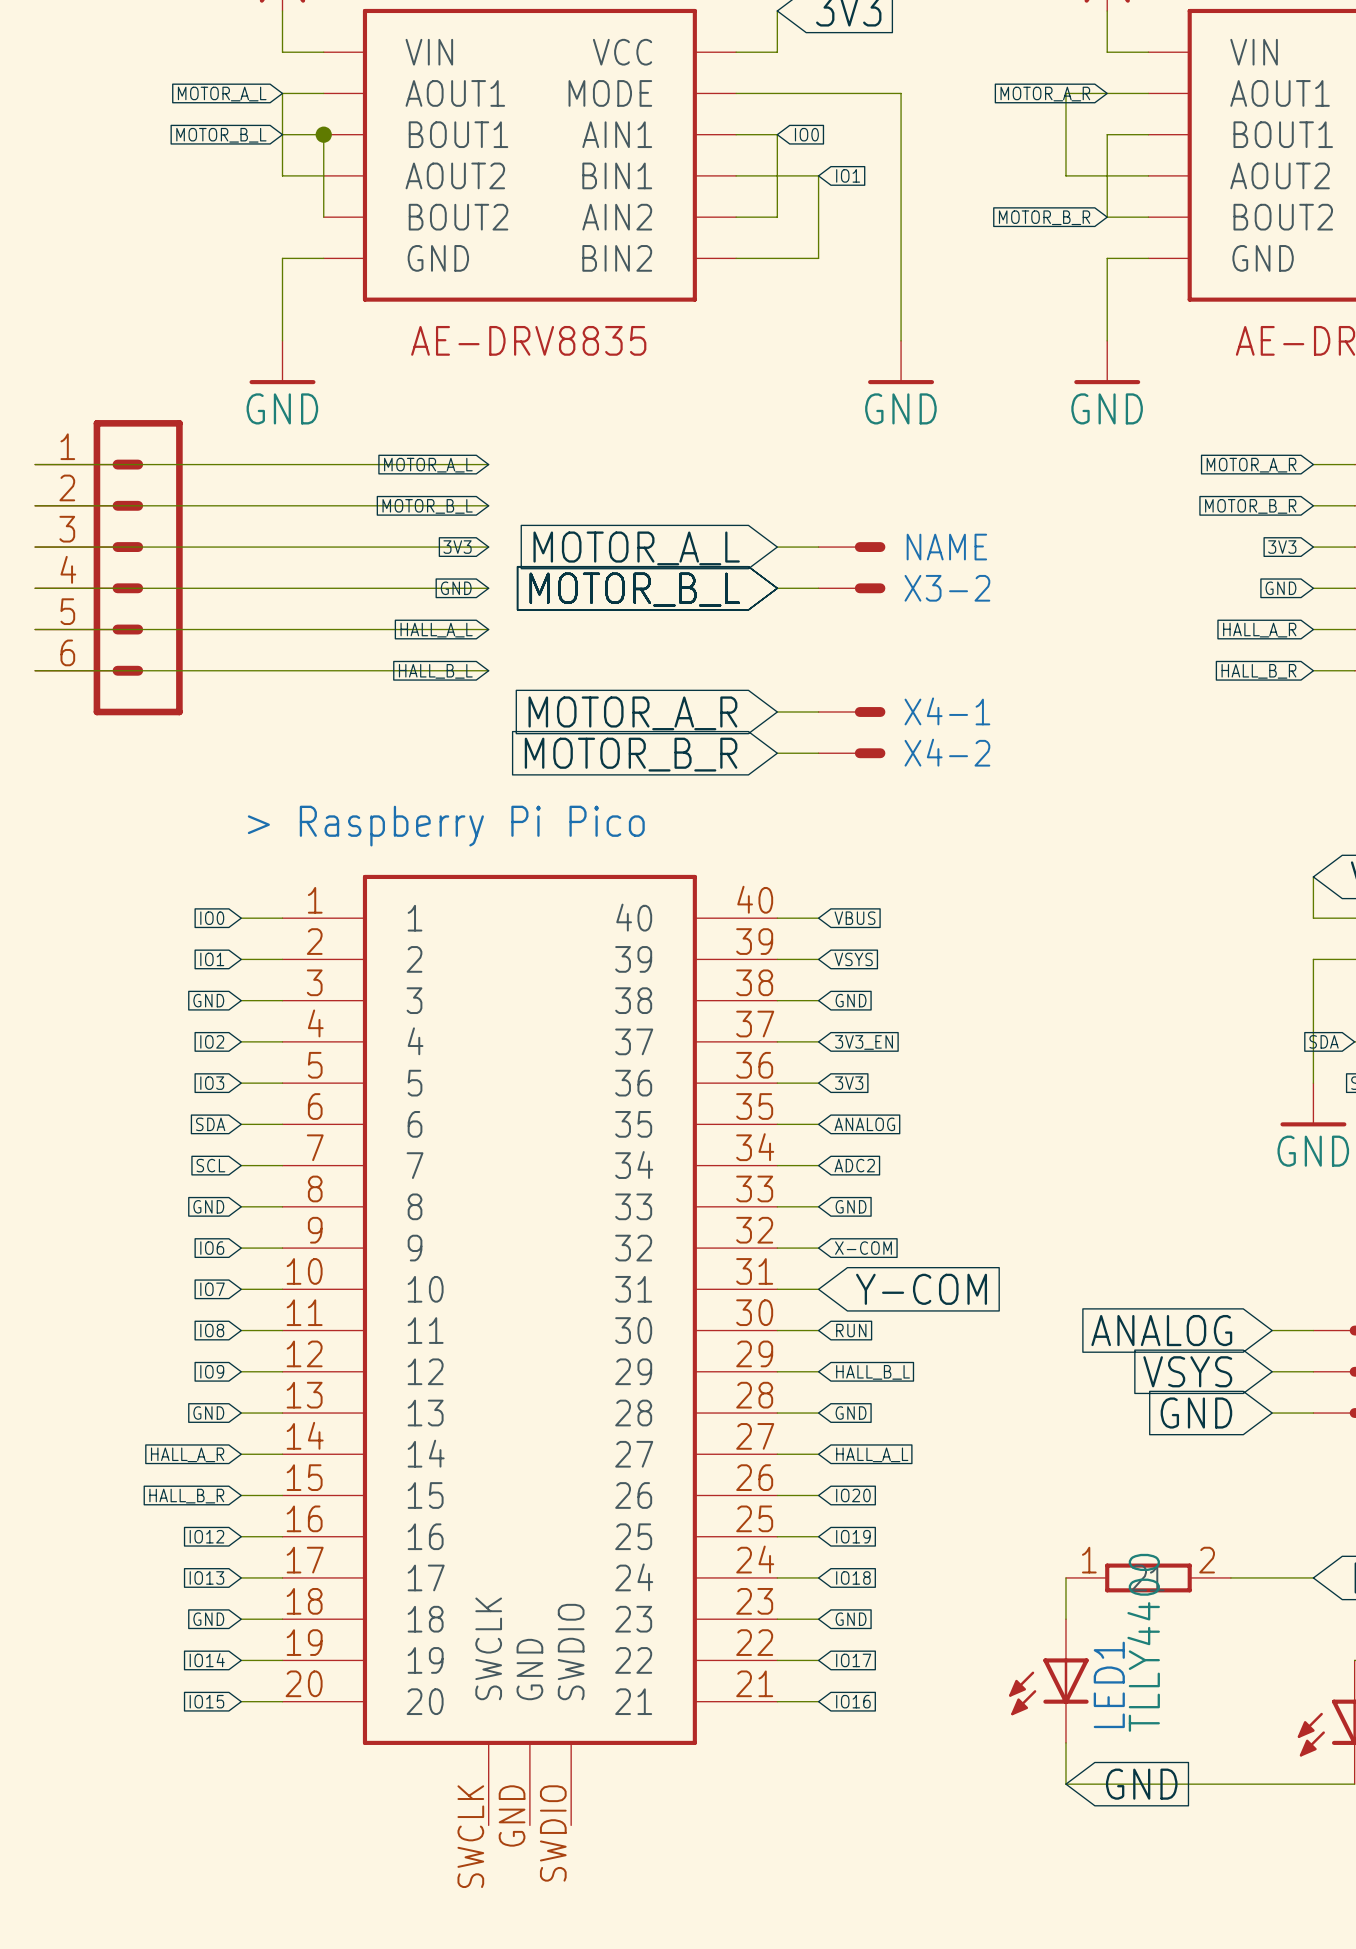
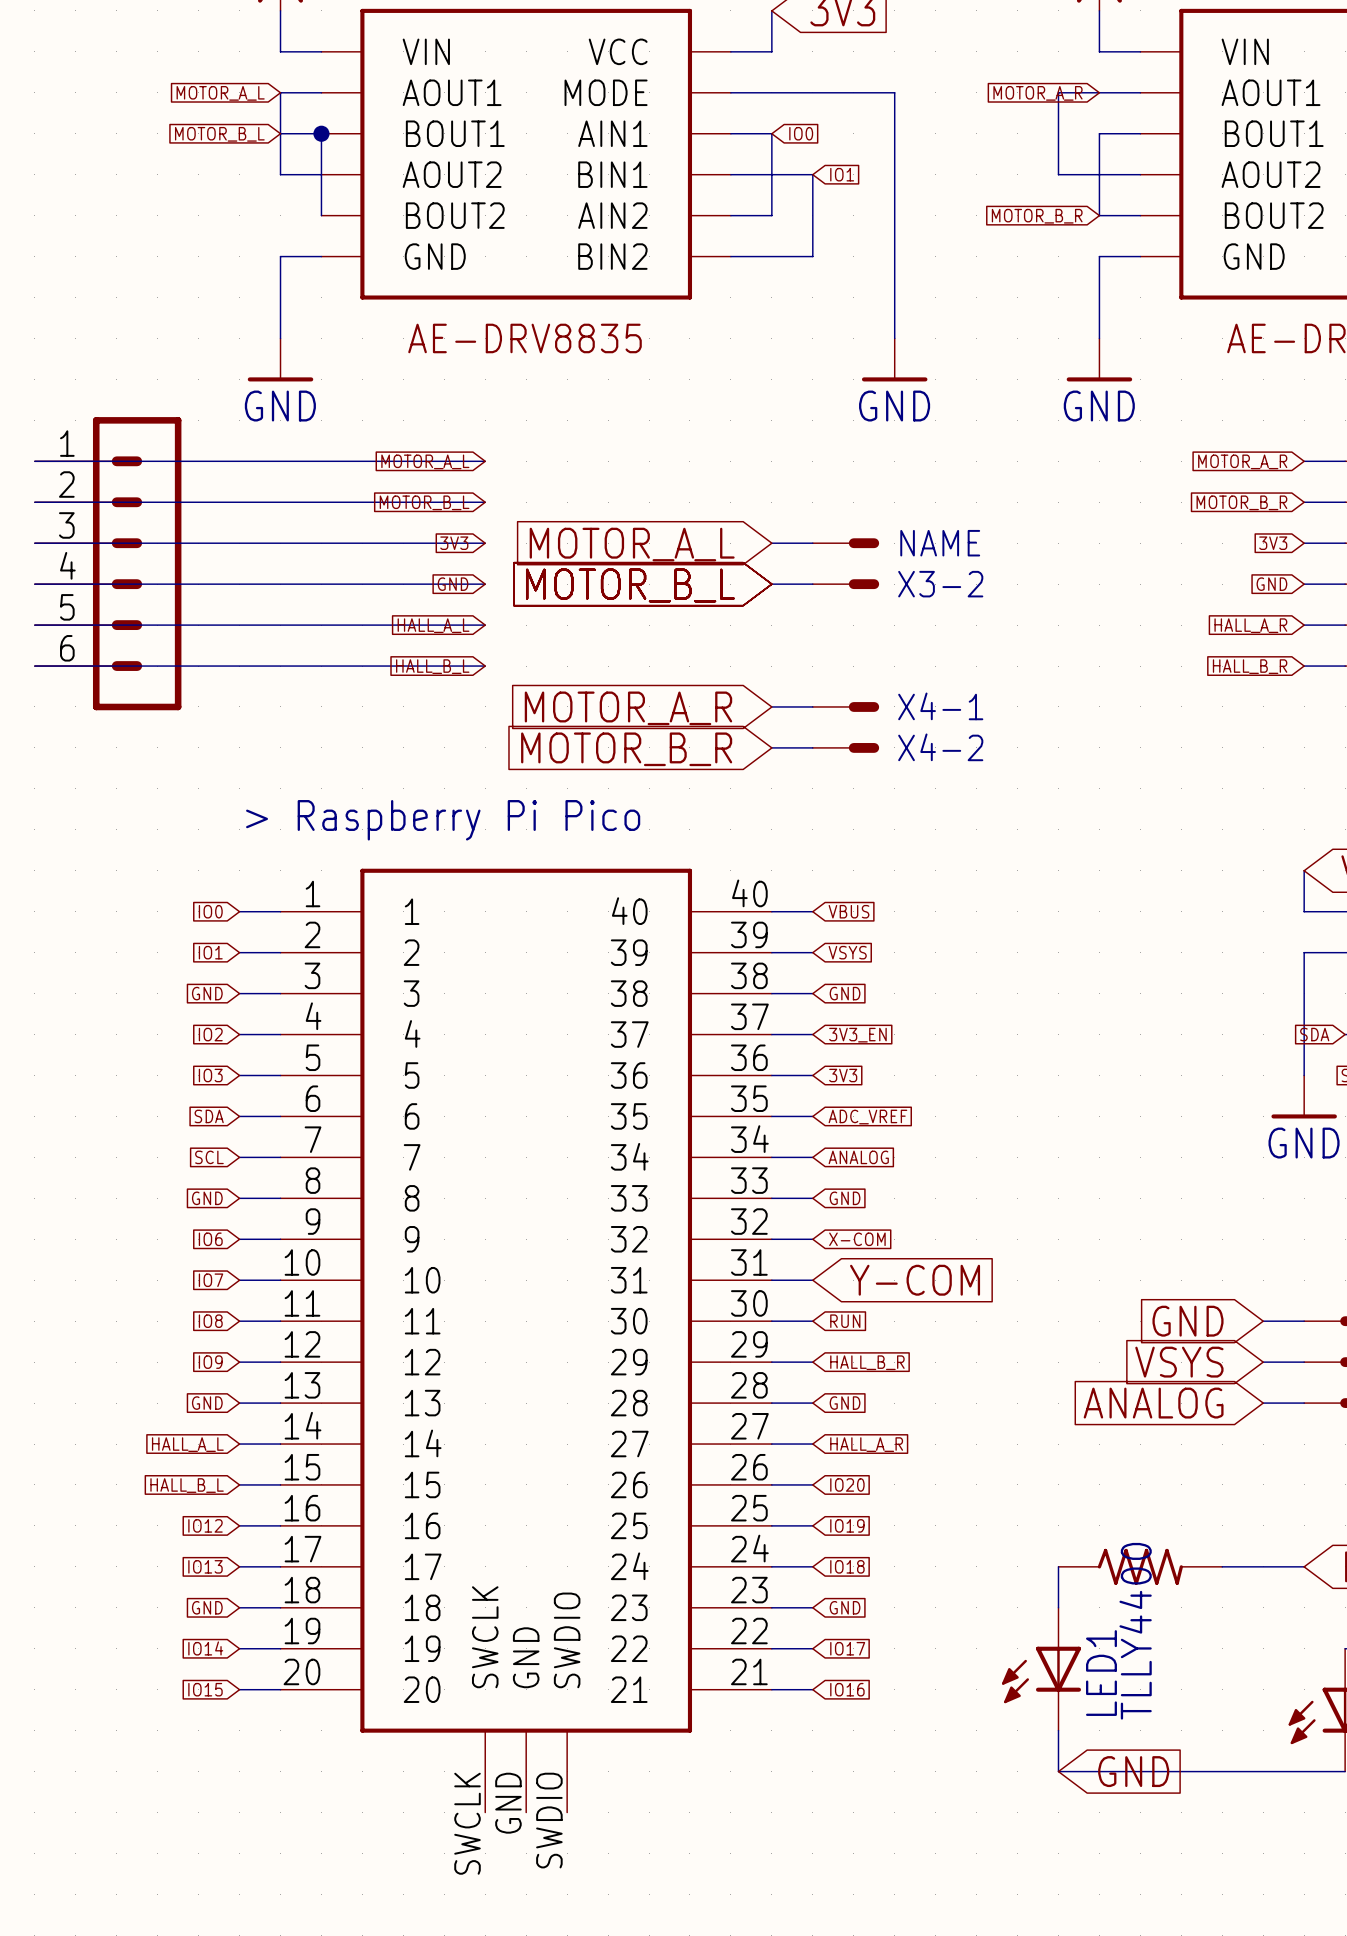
global label: ANALOG (864, 1124) -> ADC_VREF (867, 1117)
global label: ADC2 (854, 1165) -> ANALOG (858, 1157)
global label: ANALOG (1161, 1330) -> GND (1188, 1321)
global label: HALL_B_L (873, 1372) -> HALL_B_R (867, 1362)
global label: GND (1196, 1413) -> ANALOG (1153, 1403)
global label: HALL_A_R (187, 1454) -> HALL_A_L (187, 1444)
global label: HALL_A_L (872, 1454) -> HALL_A_R (866, 1444)
global label: HALL_B_R (186, 1496) -> HALL_B_L (187, 1485)
part symbol: [1065, 1563, 1231, 1593] -> [1058, 1548, 1223, 1585]

